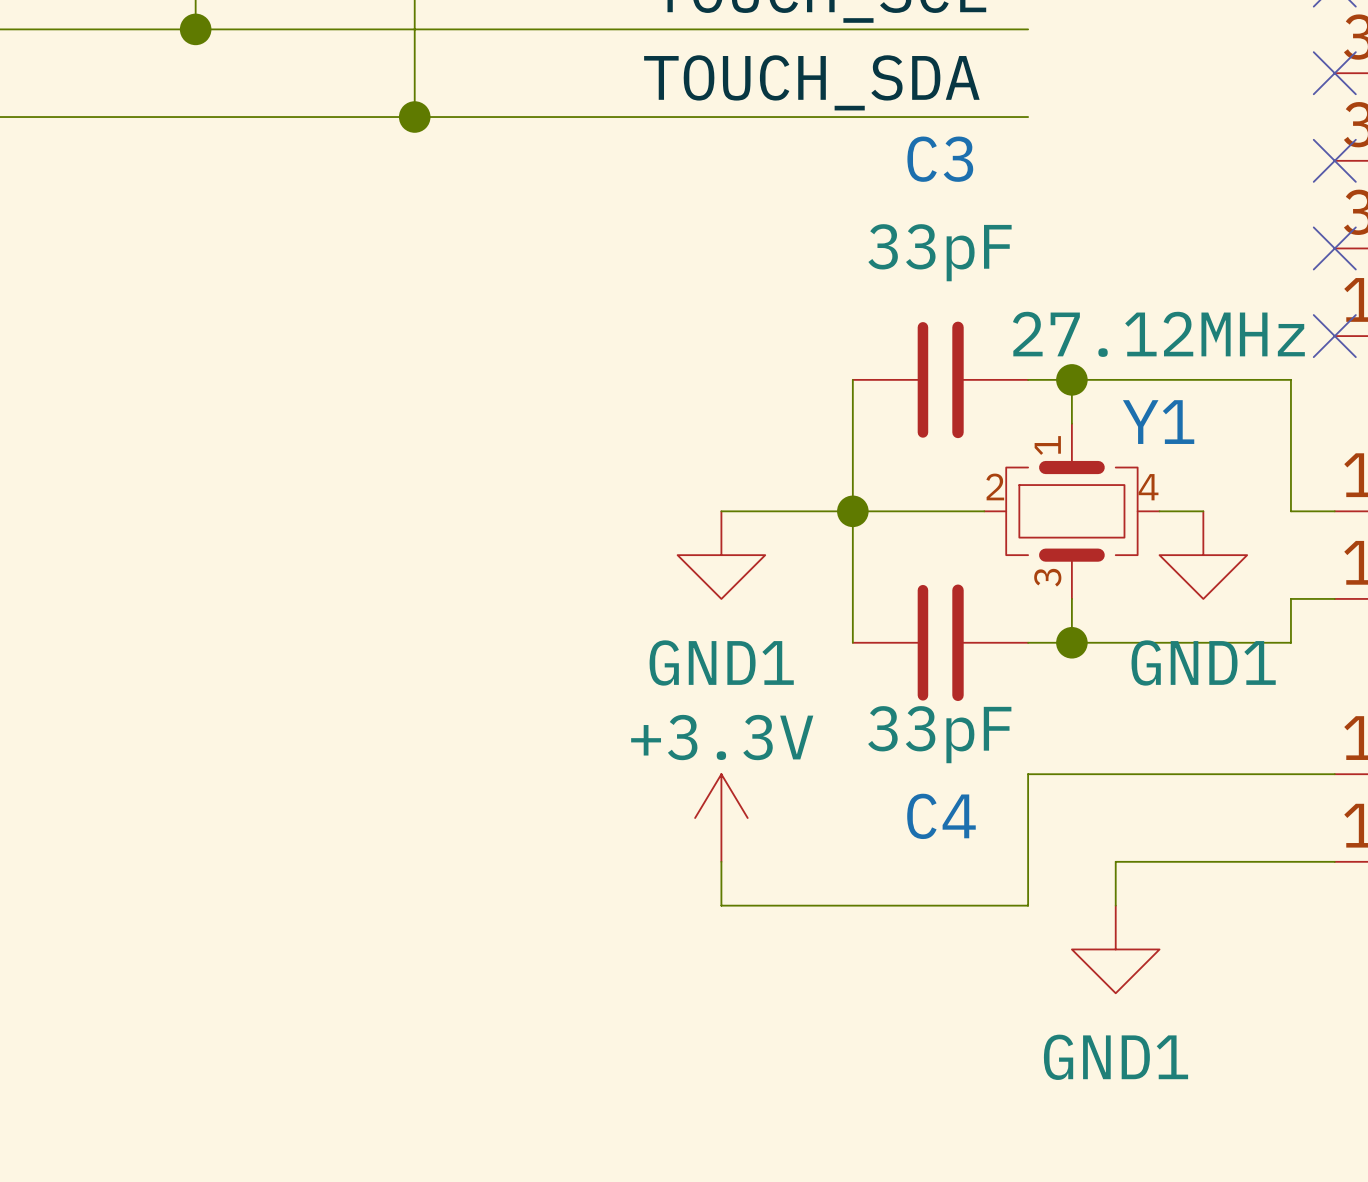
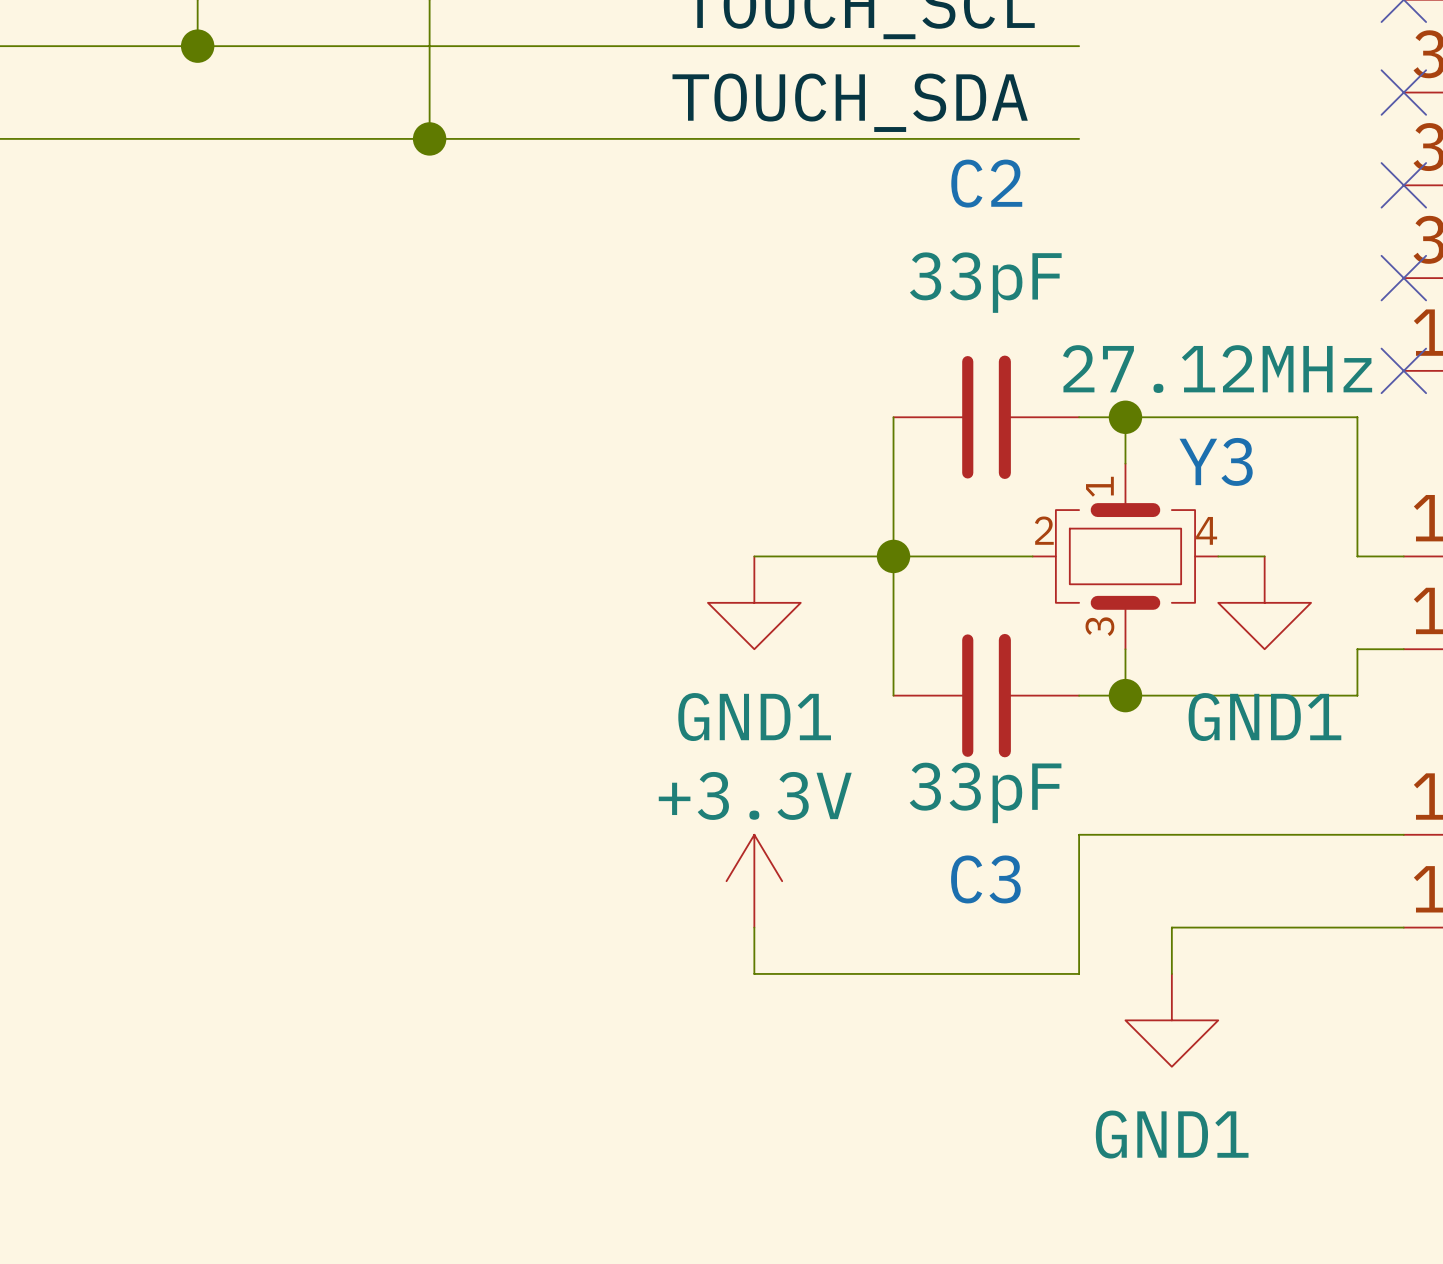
C3 name: C3 (940, 159) -> C2 (986, 183)
Y1 name: Y1 (1158, 422) -> Y3 (1216, 461)
C4 name: C4 (941, 816) -> C3 (985, 879)

